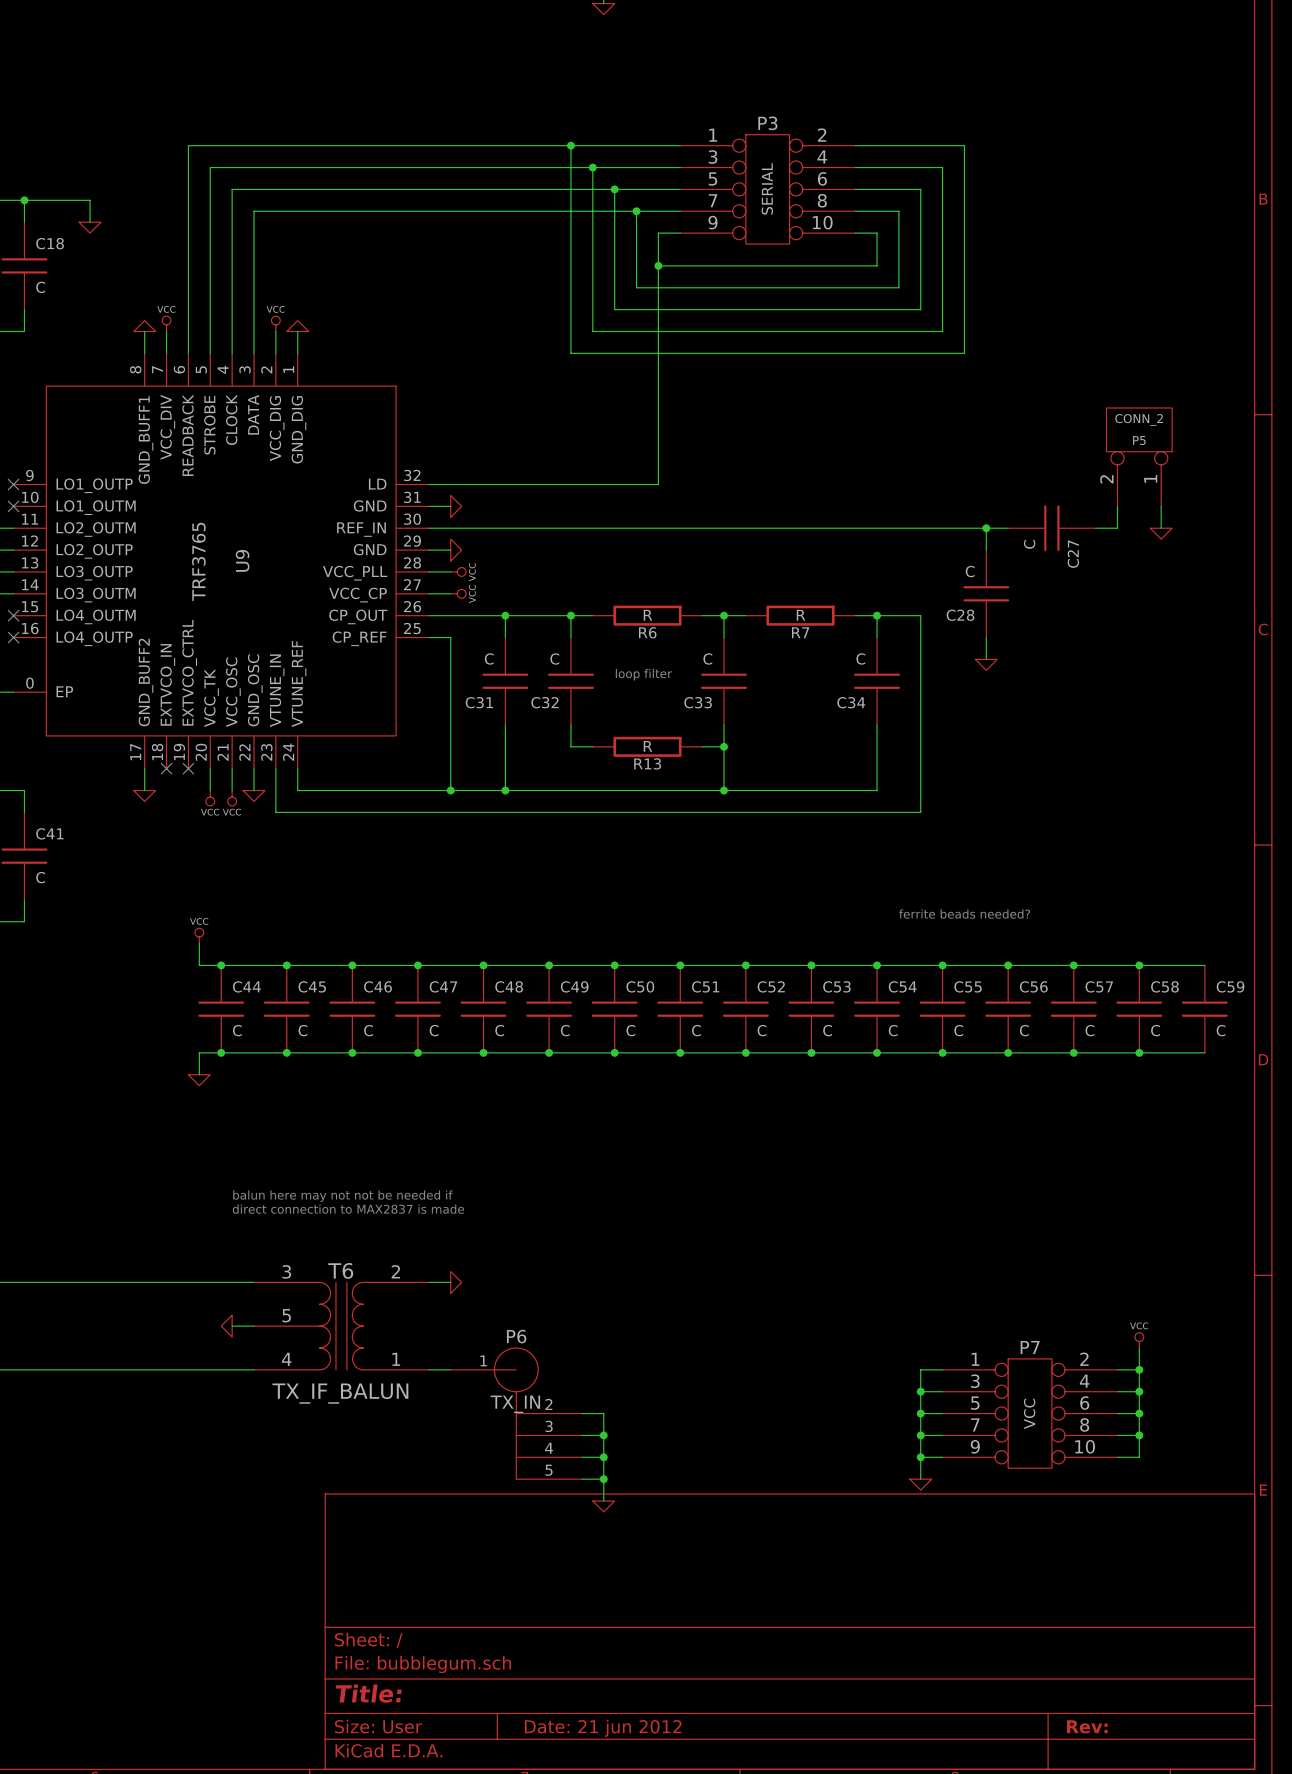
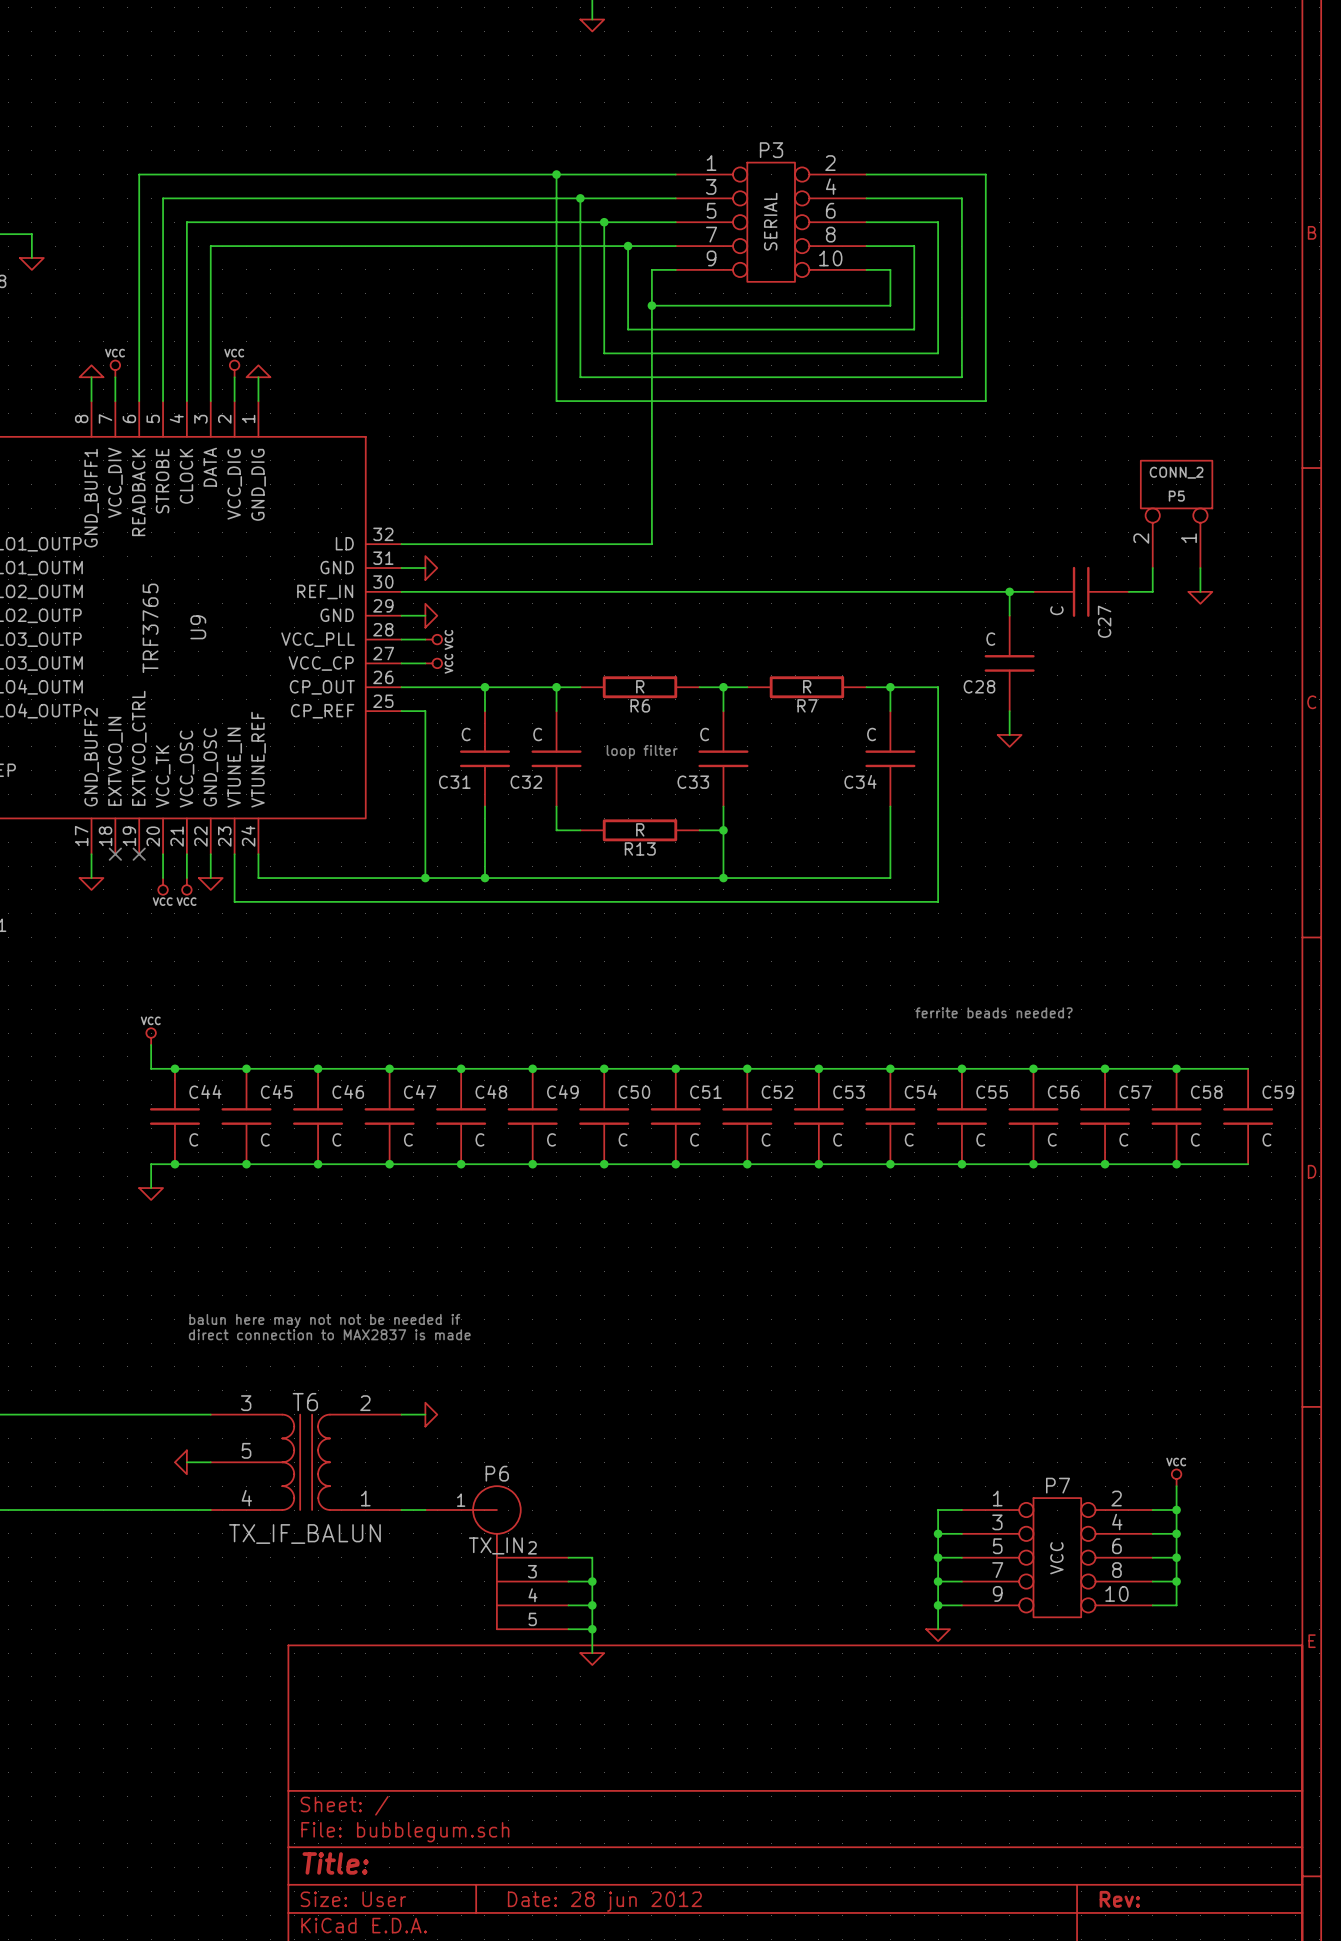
title block: Date: 21 jun 2012 (603, 1728) -> Date: 28 jun 2012 (604, 1901)

